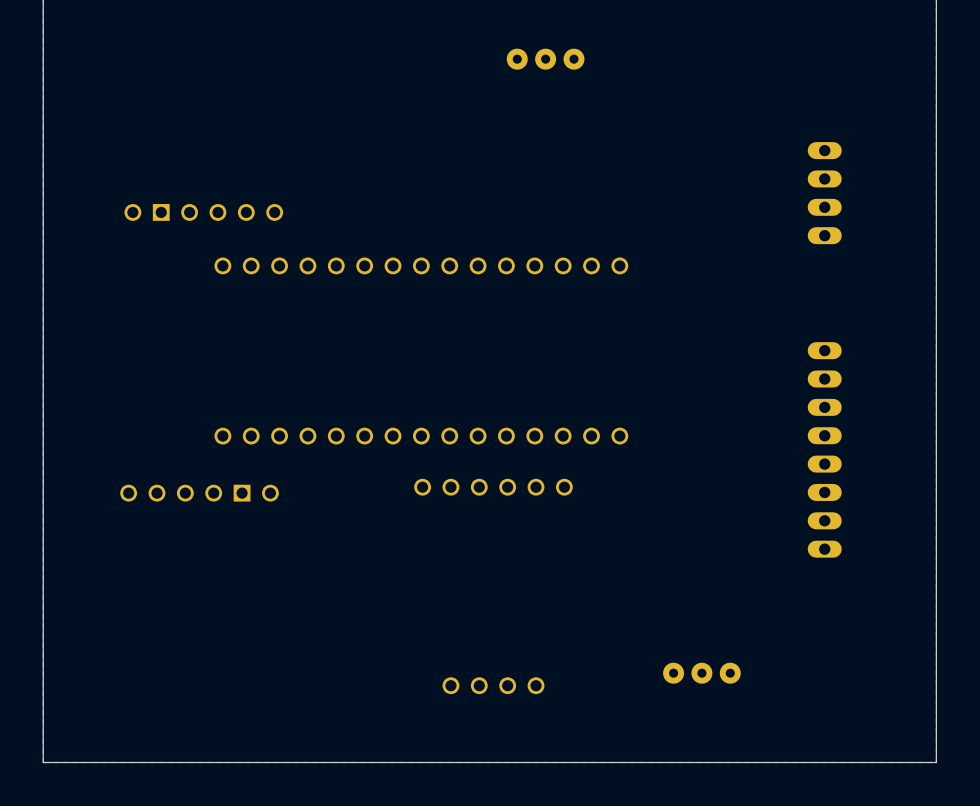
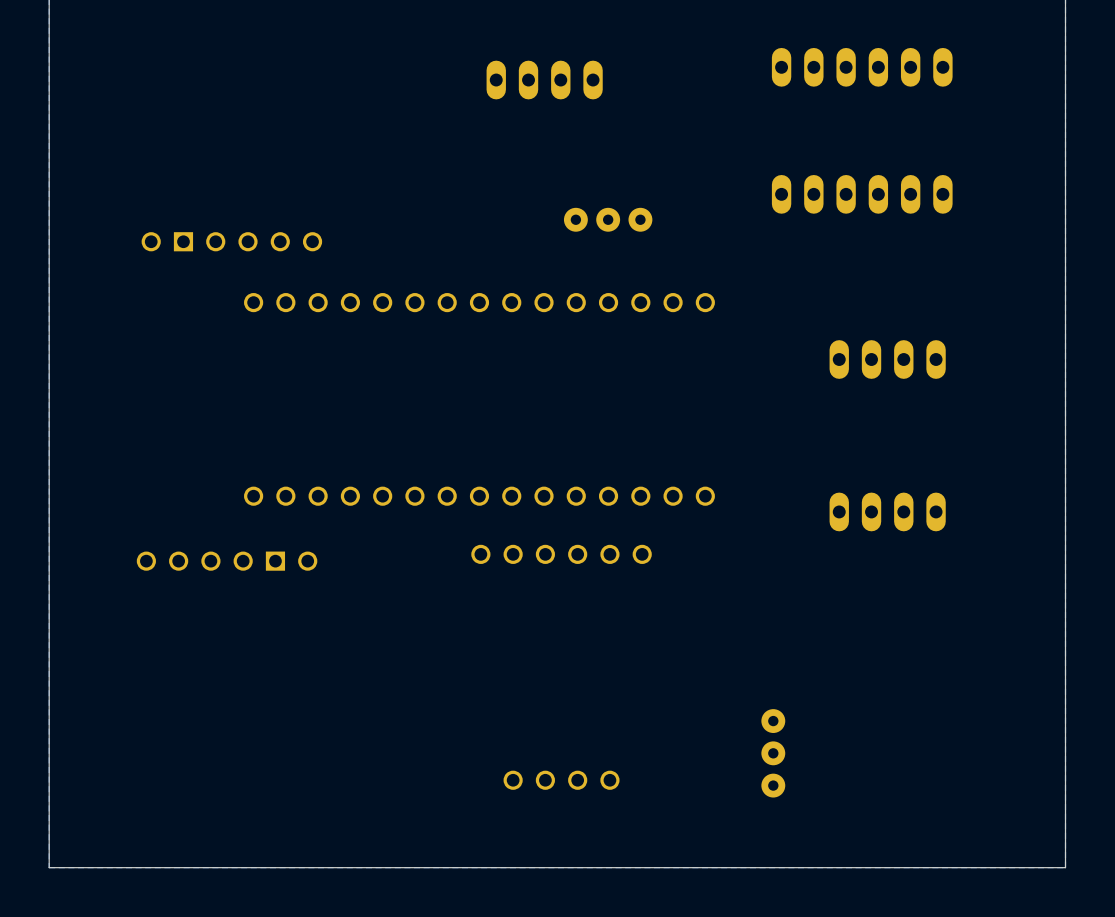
part position: (545, 59) -> (608, 219)
part: none -> (862, 67)
part: none -> (544, 80)
part: none -> (862, 194)
part: (824, 193) -> none
part: none -> (887, 359)
part: none -> (887, 511)
part: (824, 449) -> none
part rotation: 0° (701, 673) -> 90° clockwise (773, 753)

